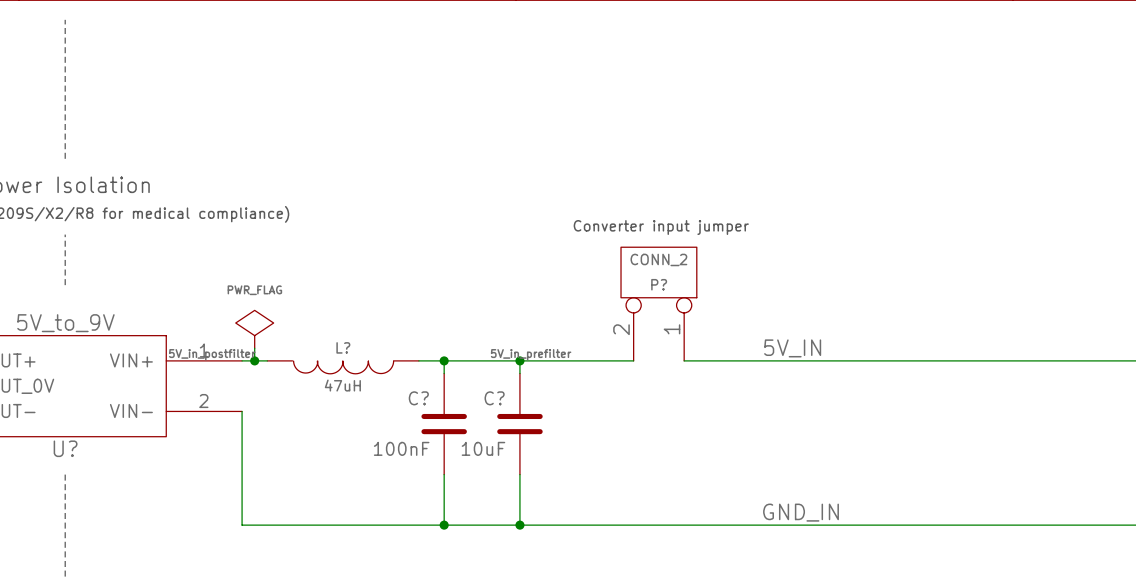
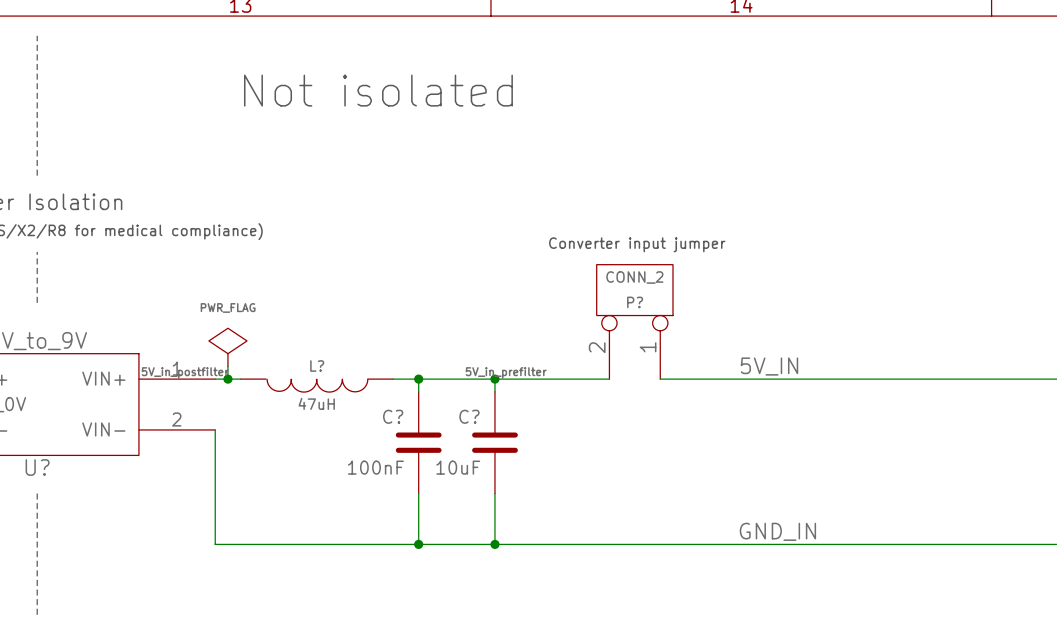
text: none -> Not isolated (378, 90)

